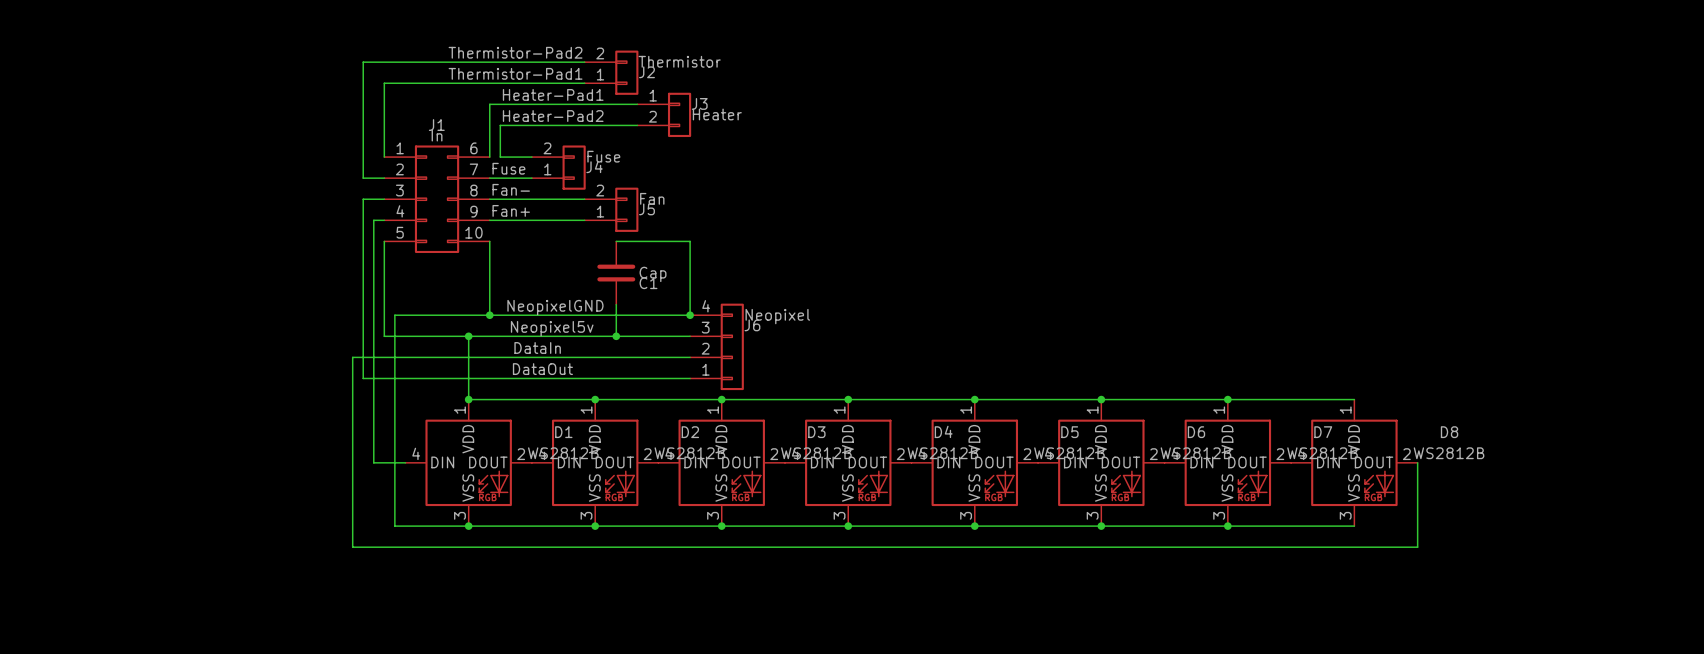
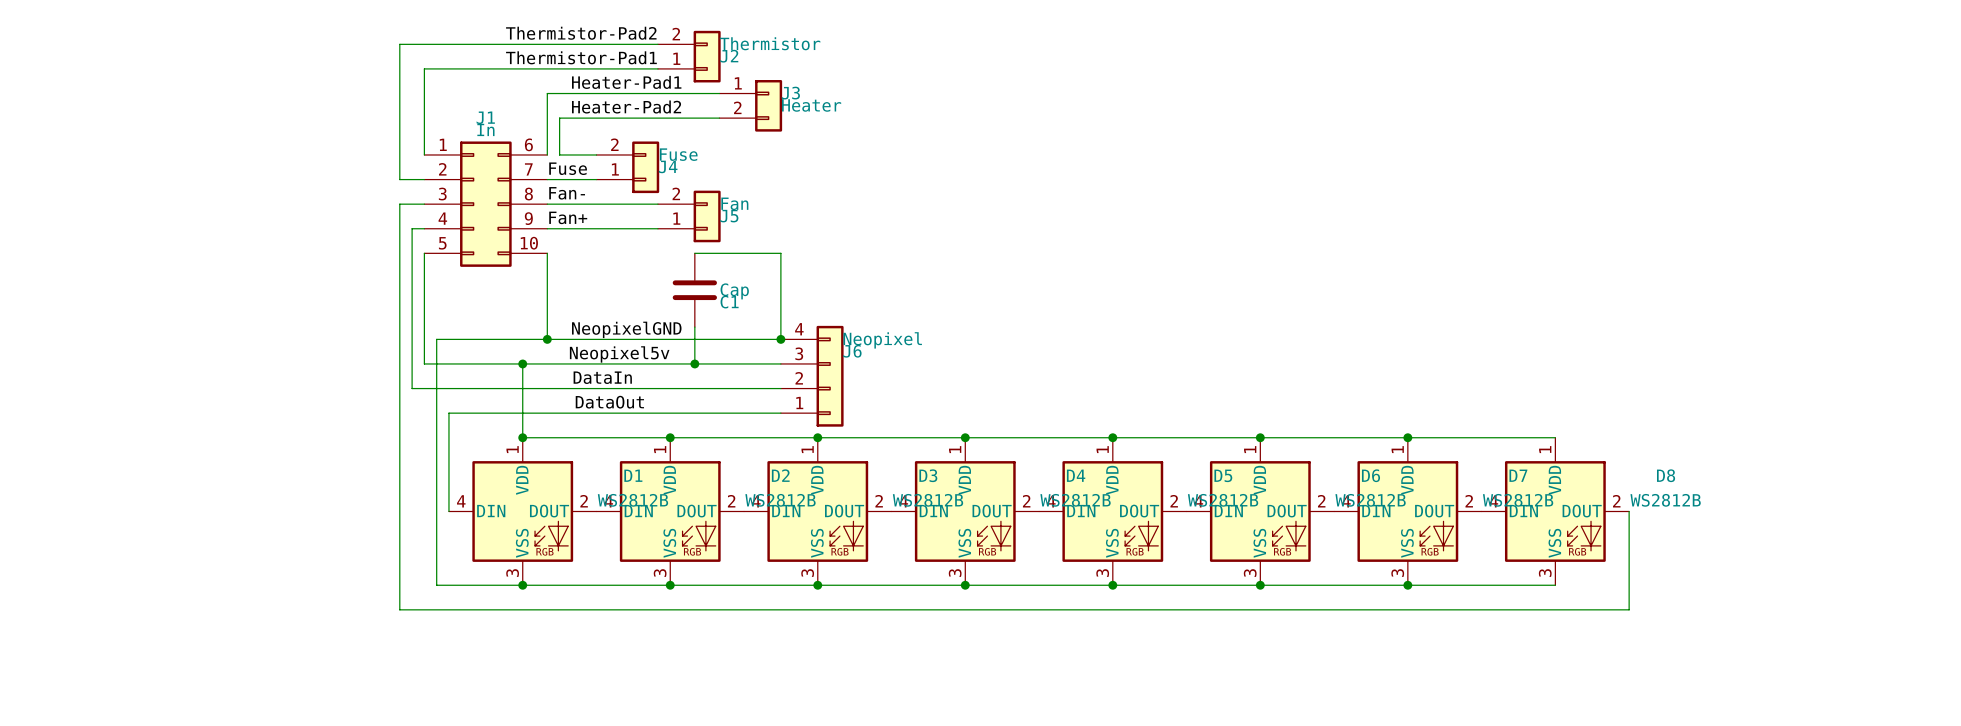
wire: (363, 378) (405, 378) -> (448, 511) (448, 413)
wire: (405, 462) (373, 462) (373, 357) (352, 357) (352, 547) (363, 547) -> (399, 413) (399, 609)

